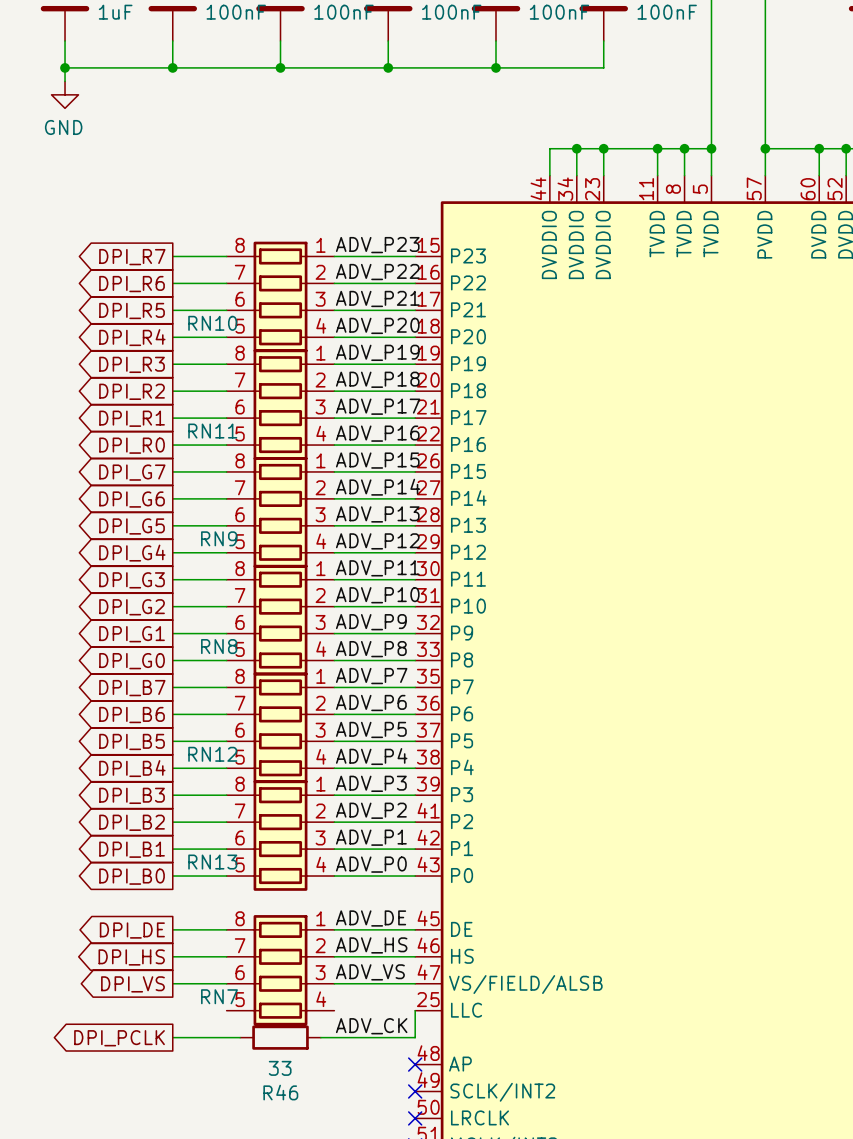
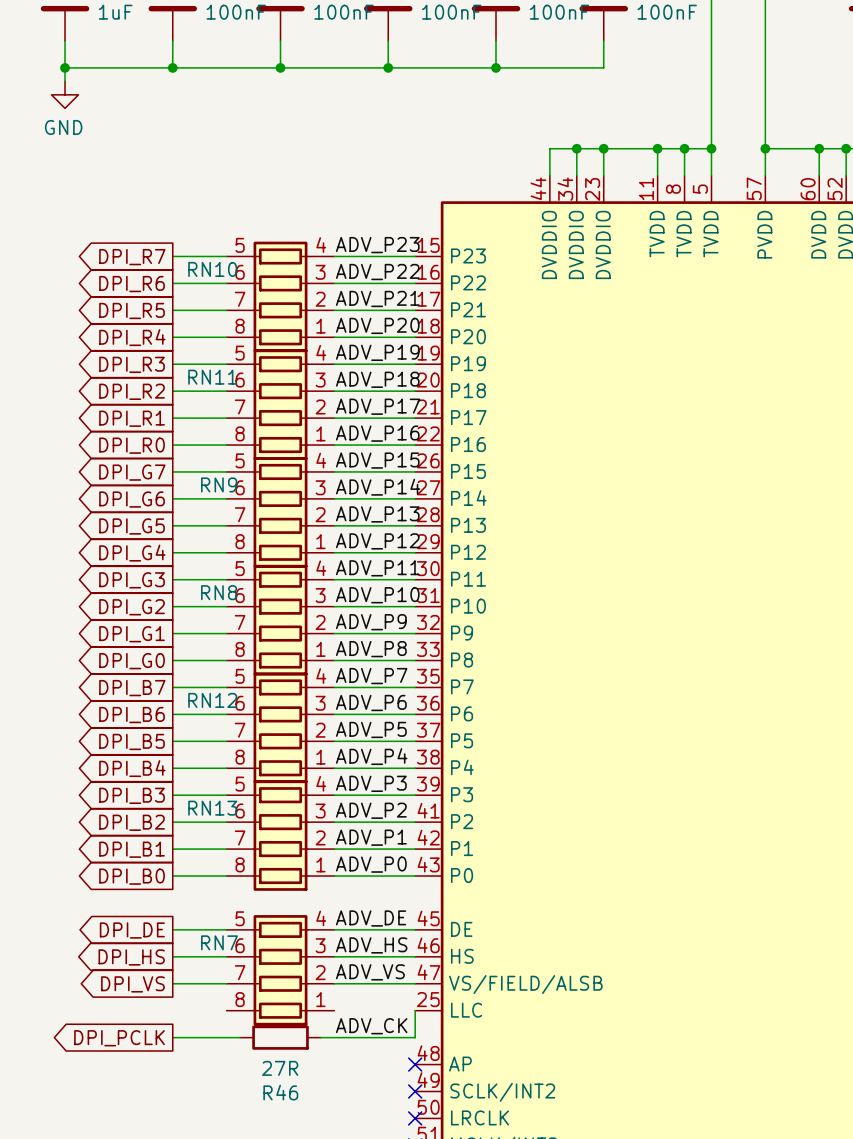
RN10 flip: as is (280, 296) -> up-down (280, 296)
RN11 flip: as is (280, 404) -> up-down (280, 404)
RN9 flip: as is (280, 512) -> up-down (280, 512)
RN8 flip: as is (280, 620) -> up-down (280, 620)
RN12 flip: as is (280, 727) -> up-down (280, 727)
RN13 flip: as is (280, 835) -> up-down (280, 835)
RN7 flip: as is (280, 970) -> up-down (280, 970)
R46 value: 33 (280, 1068) -> 27R (280, 1068)

